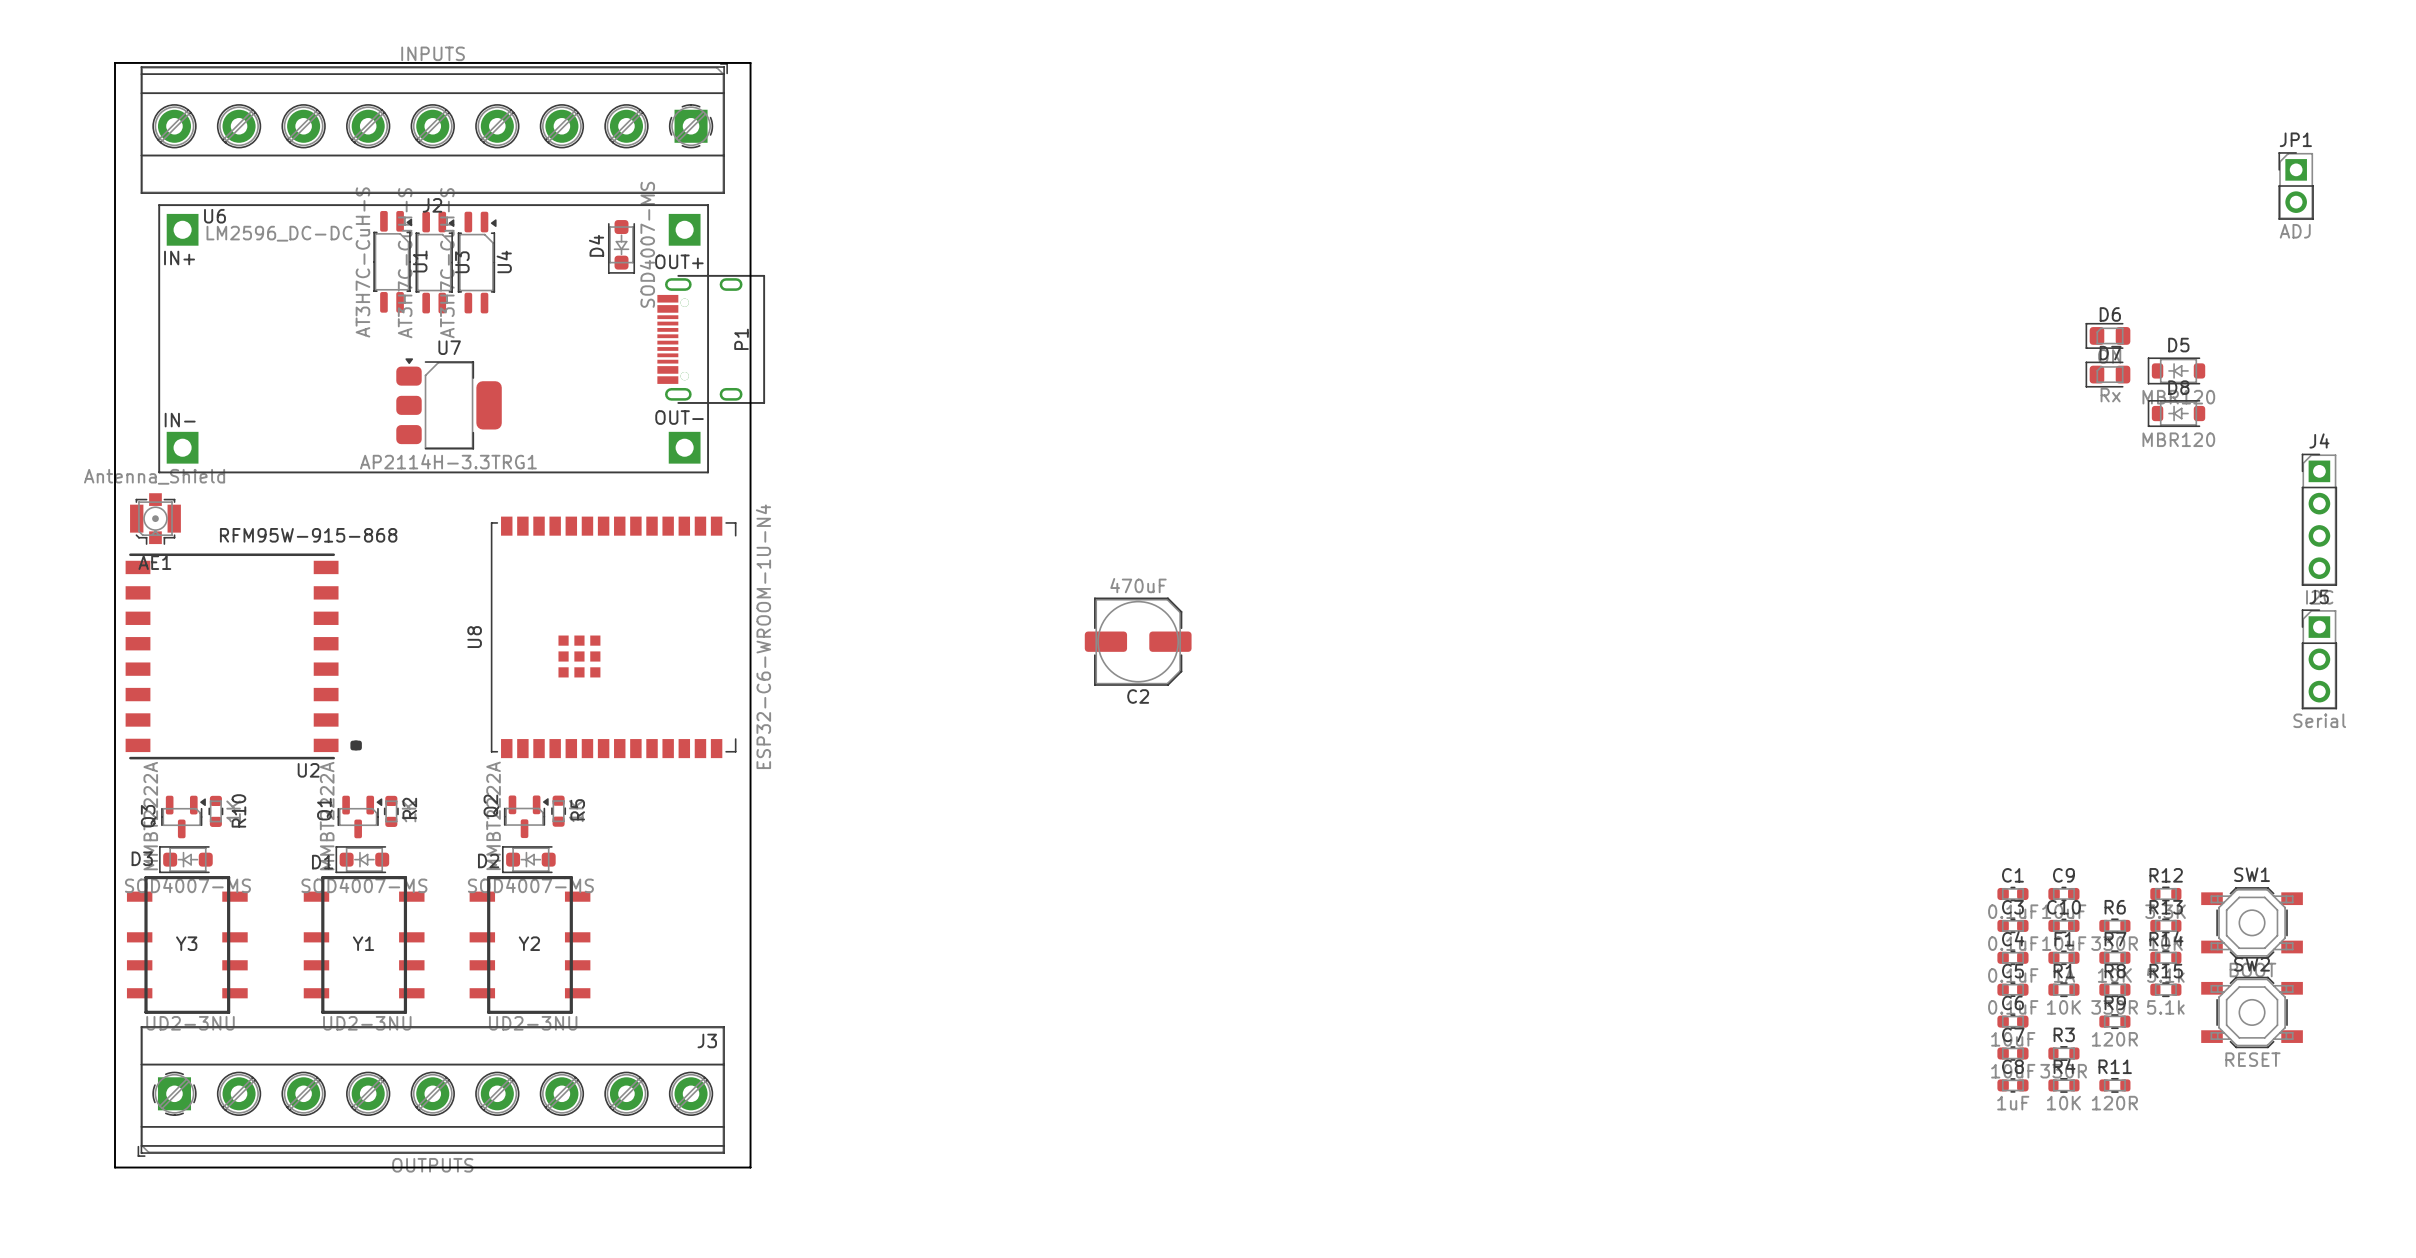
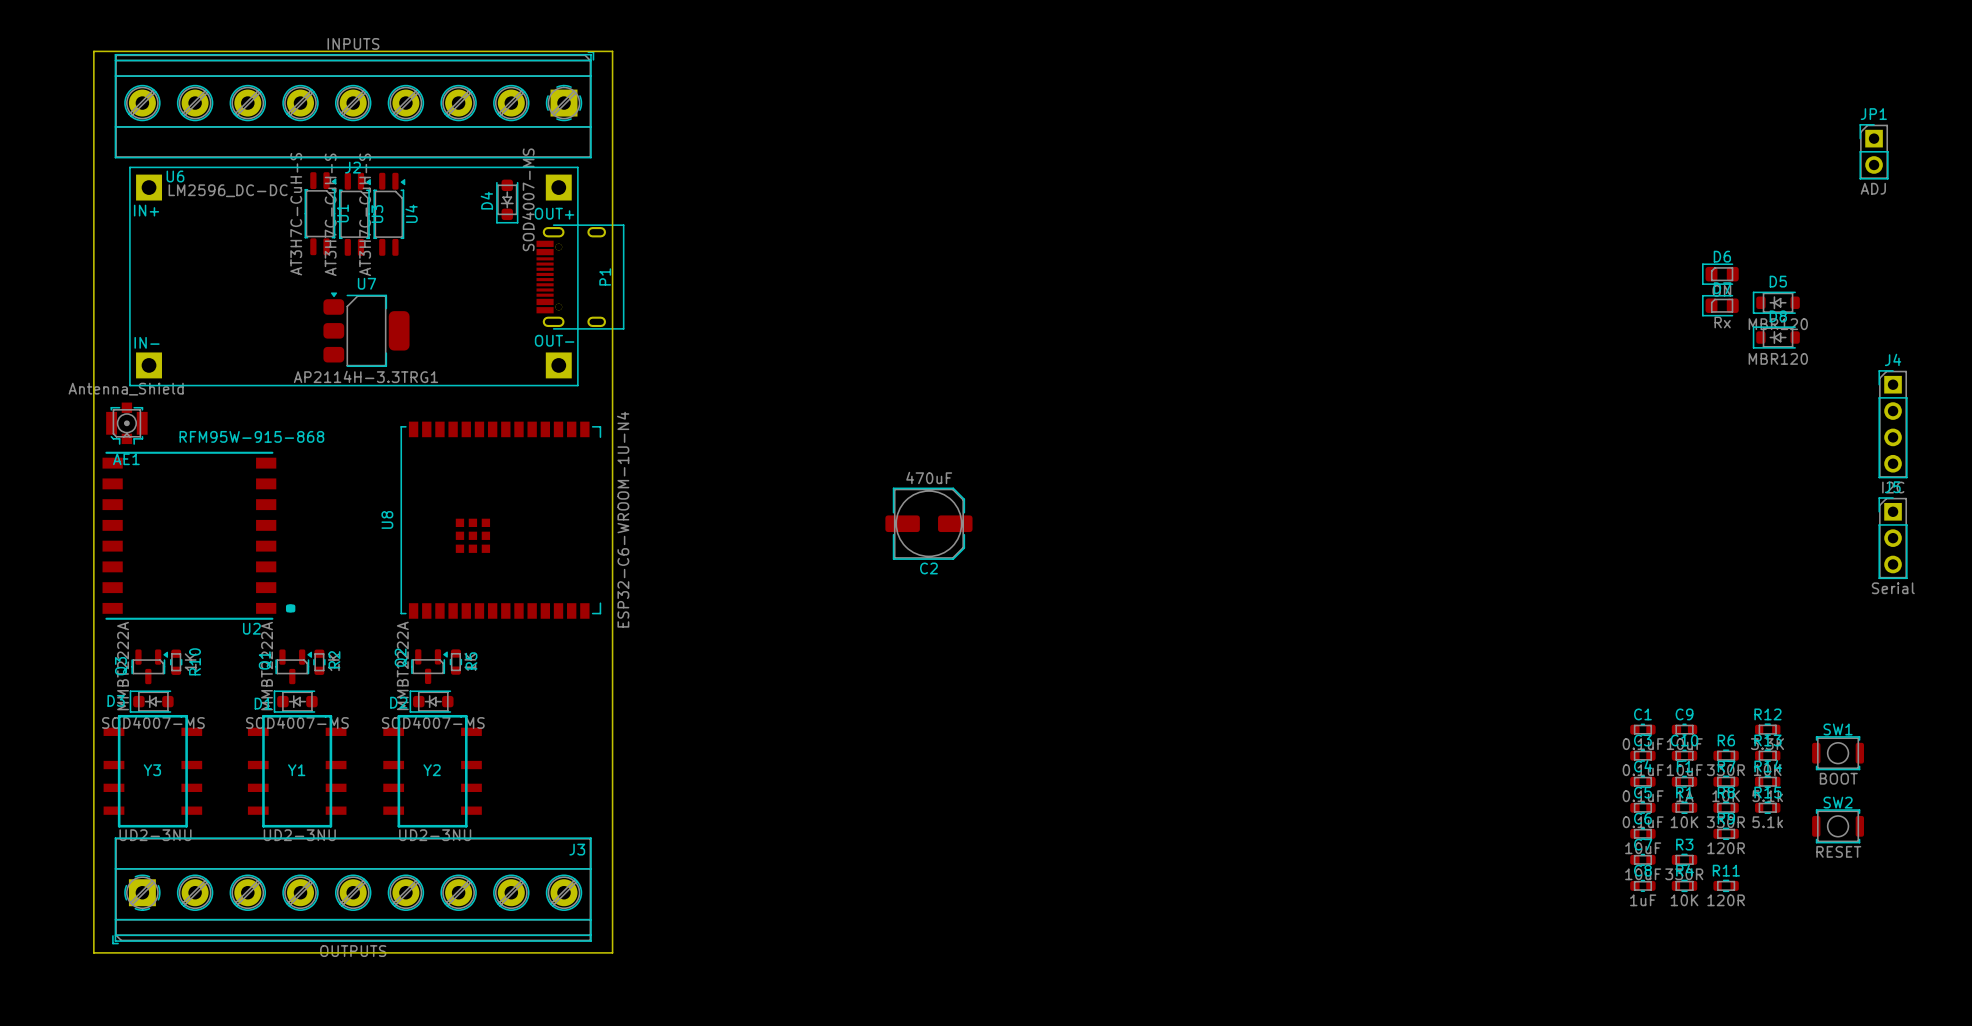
SW1 footprint: [2201, 887, 2303, 959] -> [1812, 736, 1864, 771]
SW2 footprint: [2201, 976, 2303, 1049] -> [1812, 809, 1864, 844]

